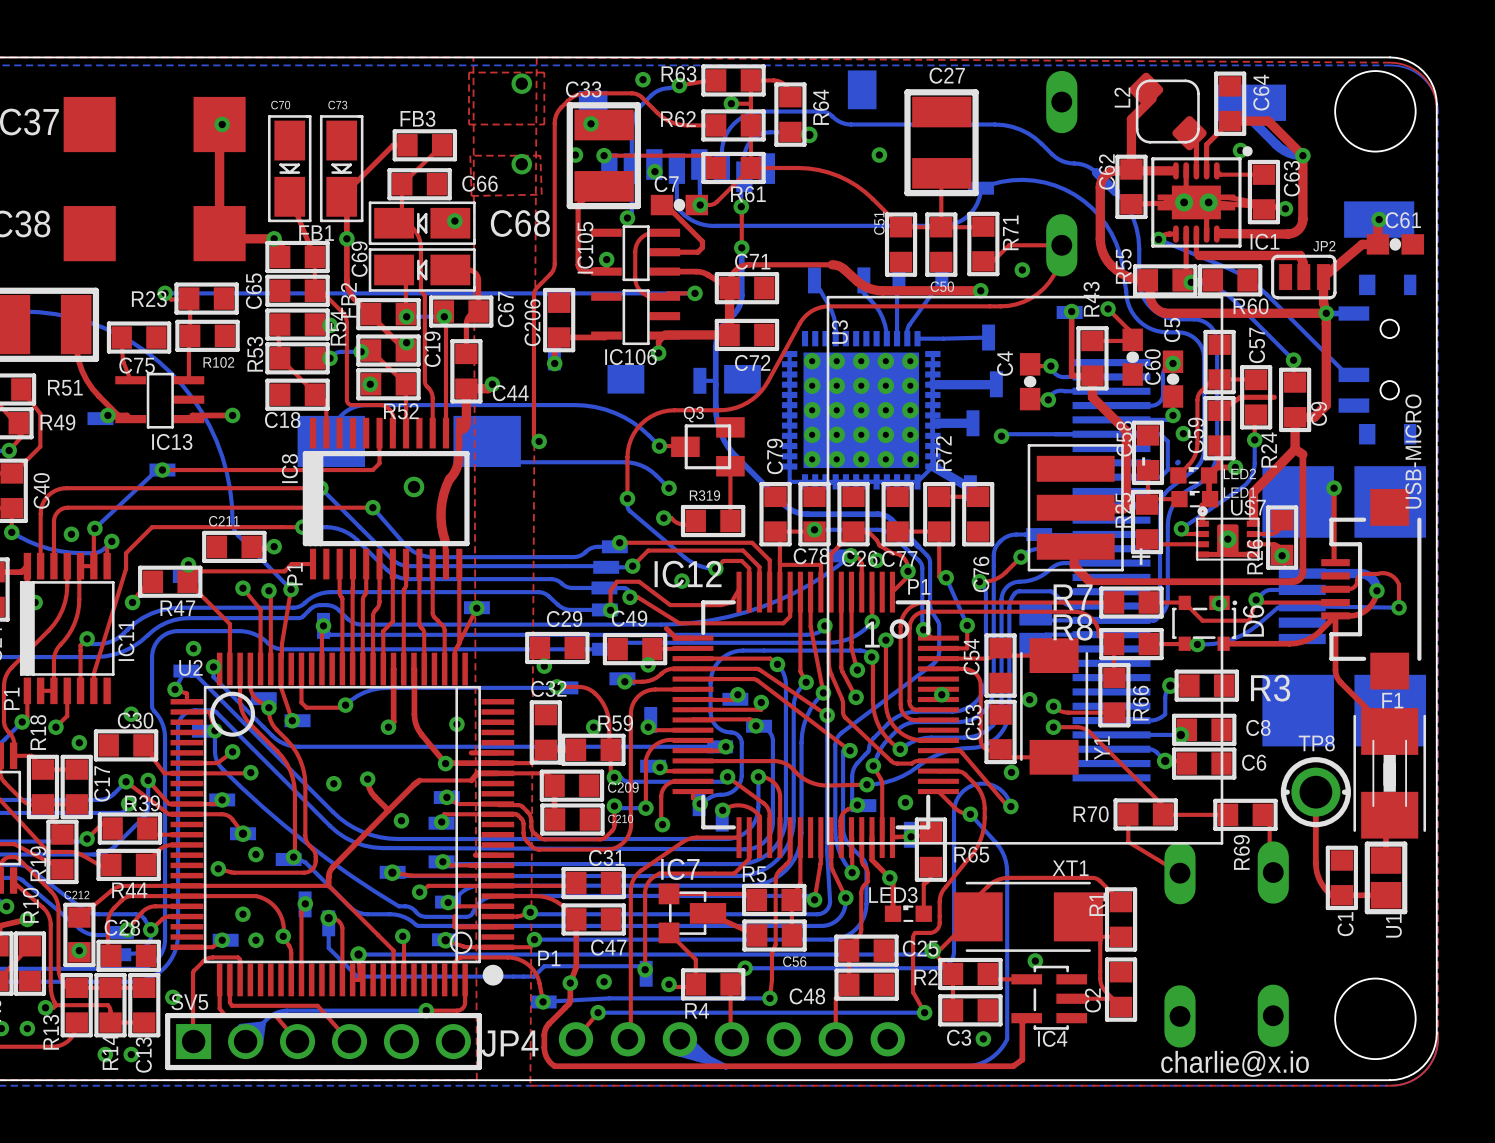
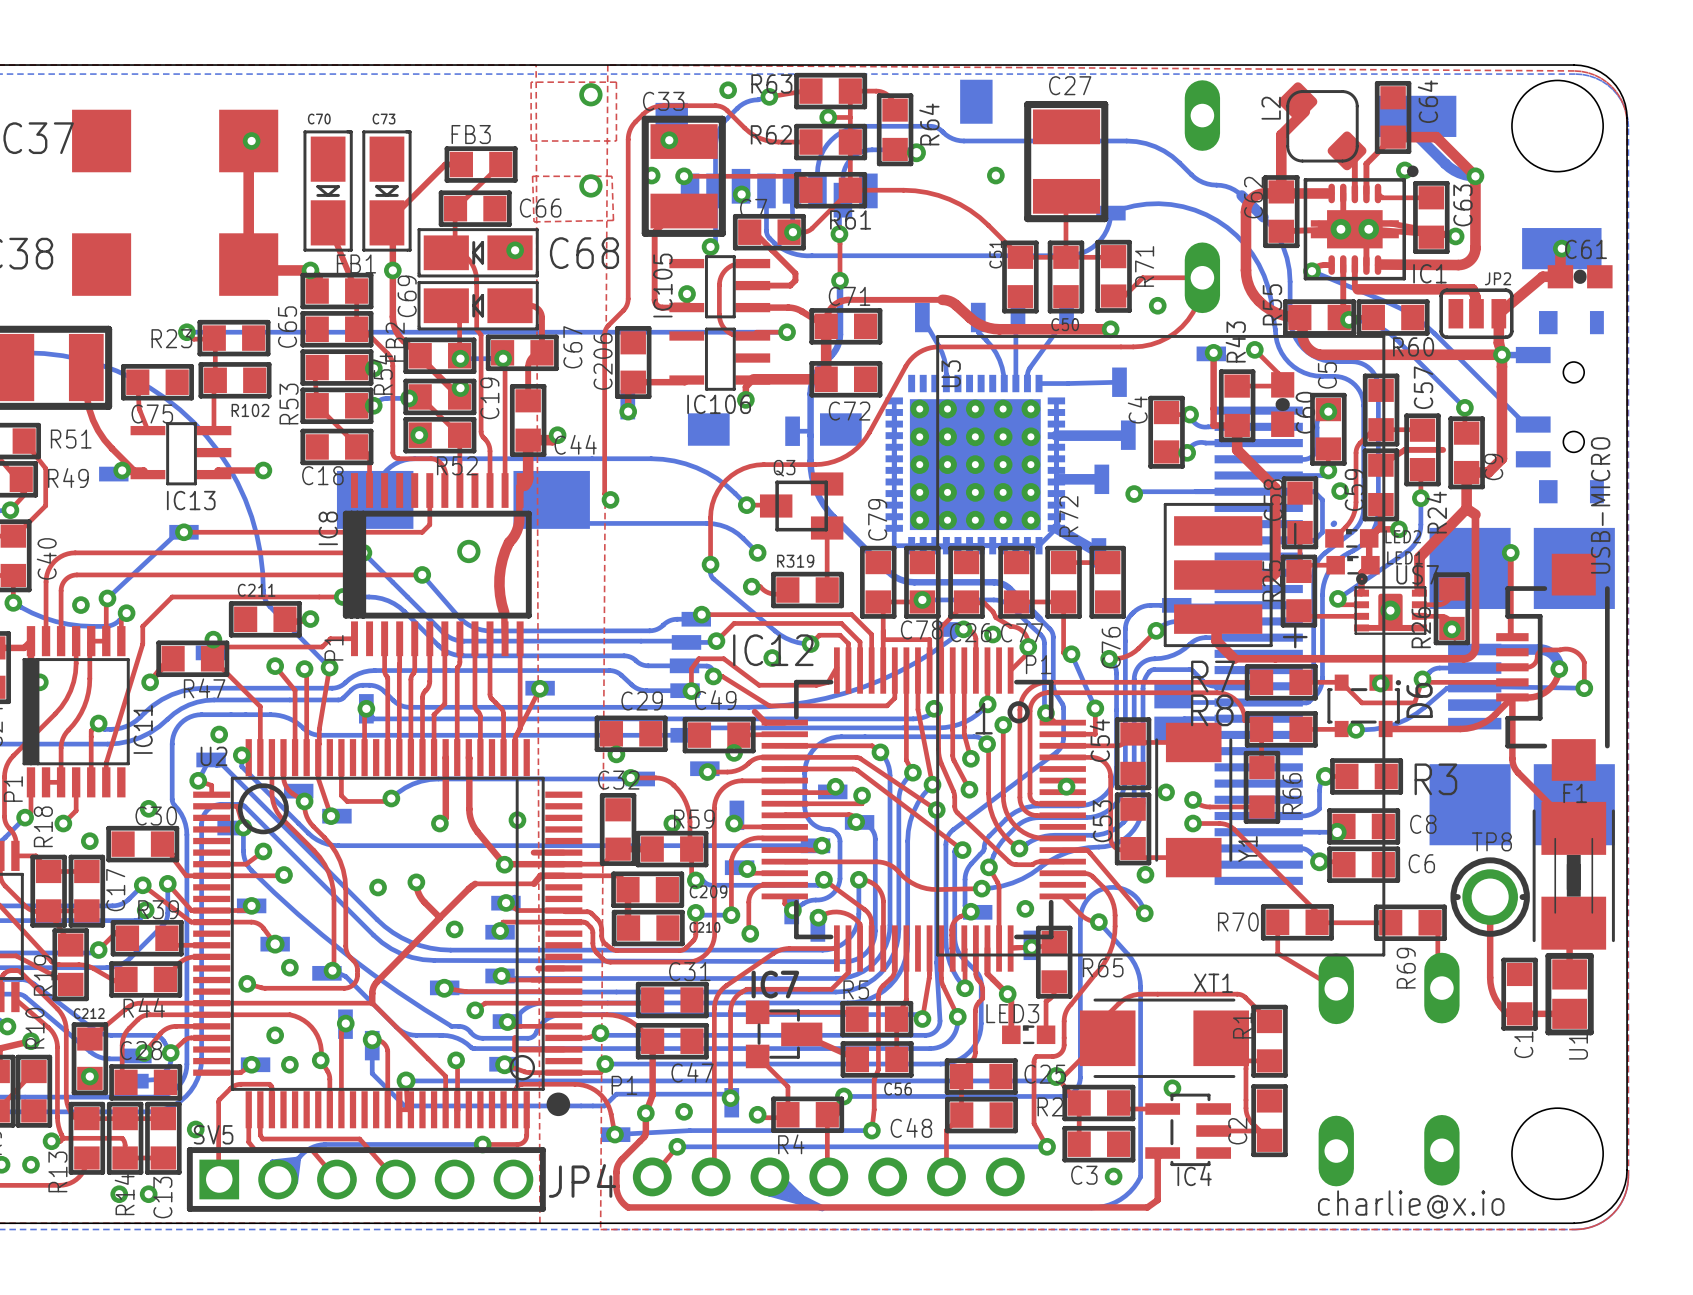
C7 footprint: [650, 194, 709, 216] -> [732, 213, 806, 251]
C5 footprint: [1162, 350, 1184, 408] -> [1310, 392, 1347, 466]
C4 footprint: [1019, 353, 1041, 411] -> [1148, 395, 1185, 469]

